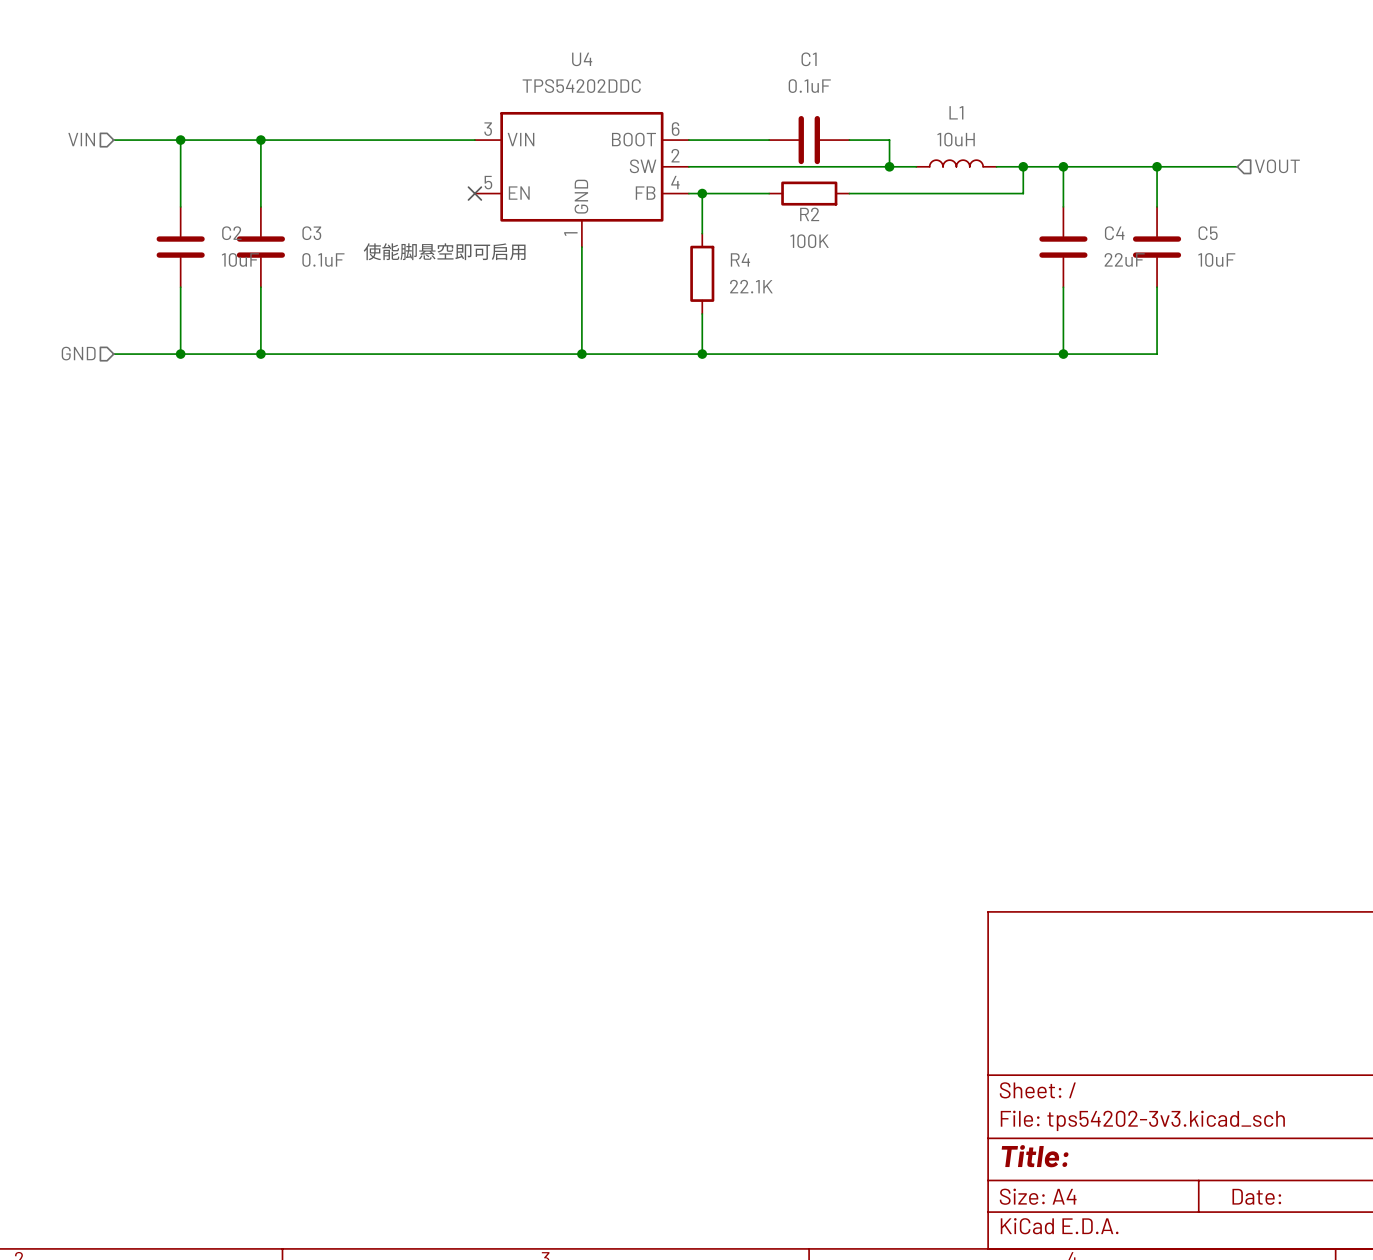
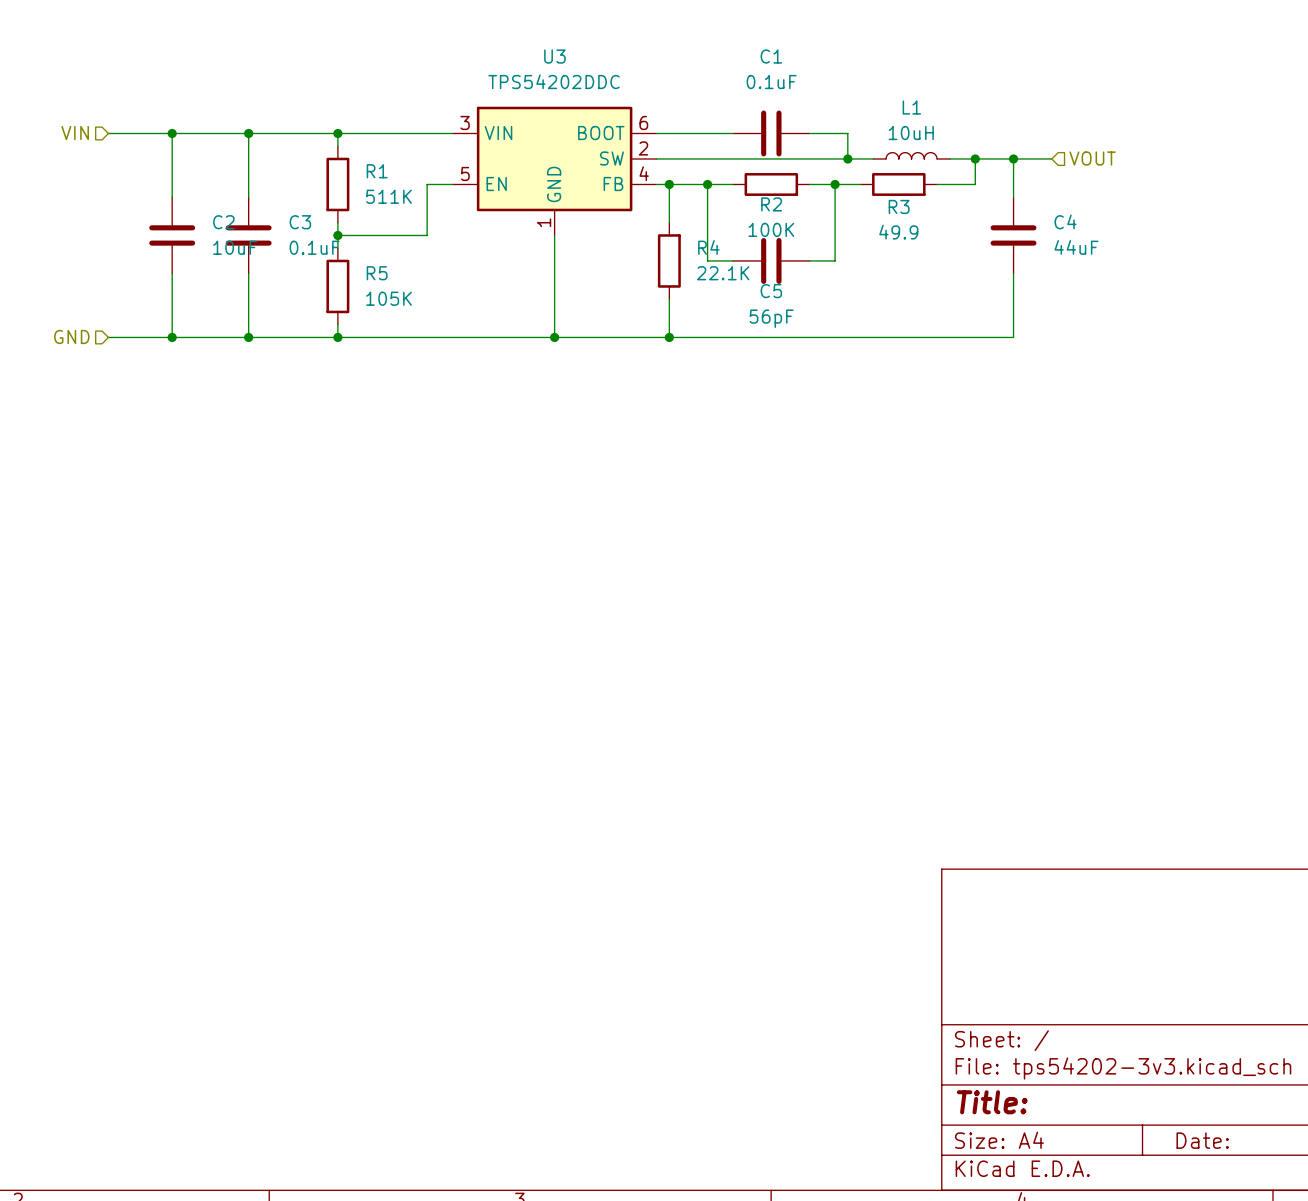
U4 name: U4 (582, 59) -> U3 (554, 56)
wire: none -> (337, 133) (337, 146)
junction: none -> (337, 133)
wire: (1103, 166) (1237, 166) -> none
wire: (1157, 166) (1157, 206) -> none
junction: (1157, 166) -> none
hierarchical label position: VOUT (1277, 166) -> VOUT (1092, 158)
R1: none -> 511K (337, 184)
wire: none -> (452, 184) (427, 184) (427, 235) (337, 235)
no-connect mark: (474, 193) -> none
wire: none -> (707, 184) (707, 260) (733, 260)
junction: none -> (707, 184)
wire: none -> (835, 184) (835, 260) (809, 260)
junction: none -> (835, 184)
wire: (902, 193) (983, 193) -> none
R3: none -> 49.9 (898, 184)
wire: none -> (337, 222) (337, 248)
C5 name position: C5 (1208, 233) -> C5 (771, 291)
junction: none -> (337, 235)
C5 rotation: 0° (1157, 247) -> 90° clockwise (771, 260)
C5 position: (1157, 247) -> (771, 260)
text: 使能脚悬空即可启用 (444, 251) -> none
C4 value: 22uF (1124, 259) -> 44uF (1076, 247)
C5 value: 10uF (1216, 259) -> 56pF (771, 318)
wire: (1157, 287) (1157, 354) (1063, 354) -> none
R5: none -> 105K (337, 286)
wire: none -> (337, 324) (337, 337)
junction: none -> (337, 337)
junction: (1063, 354) -> none

